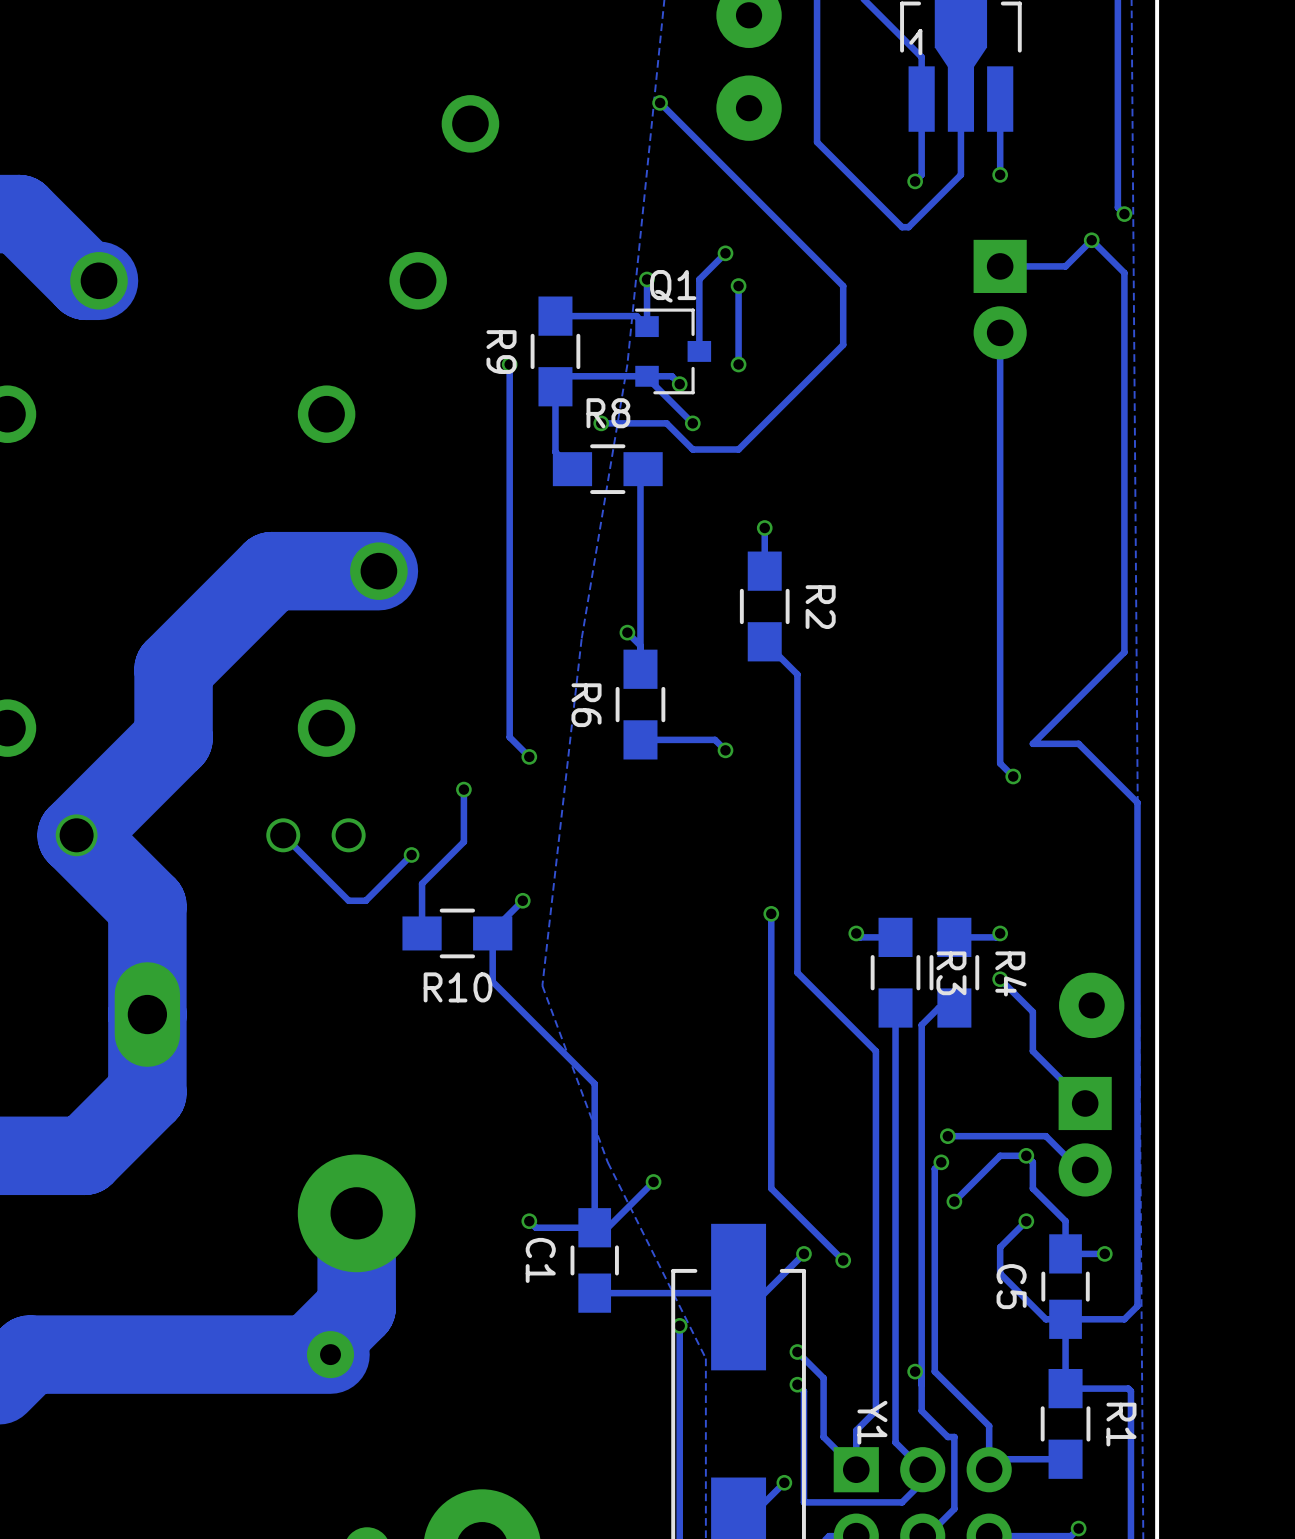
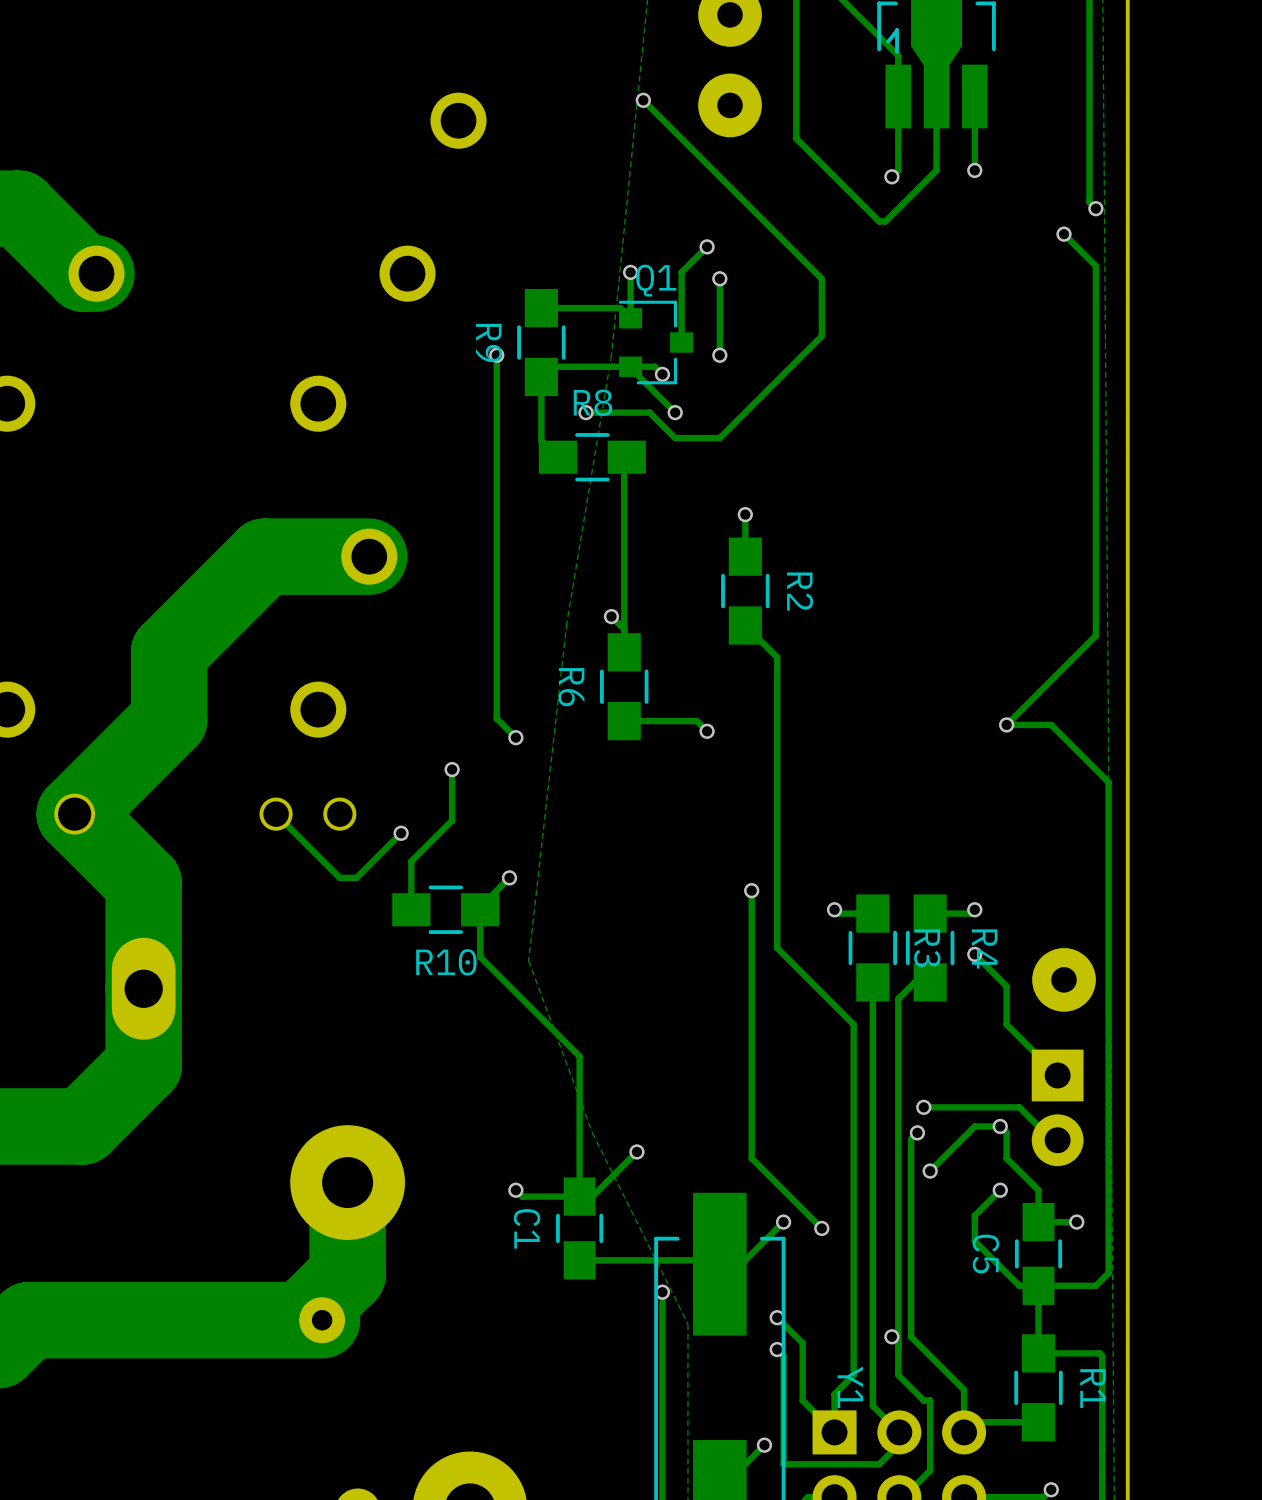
track: (1091, 240) (1065, 266) (1000, 266) -> none
part: (1000, 299) -> none
track: (1000, 332) (1000, 763) (1013, 776) -> none
via position: (1013, 776) -> (1006, 724)

